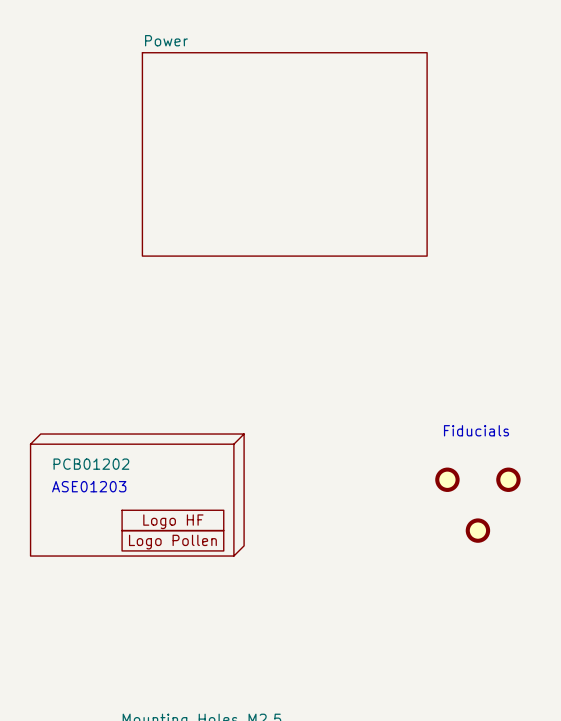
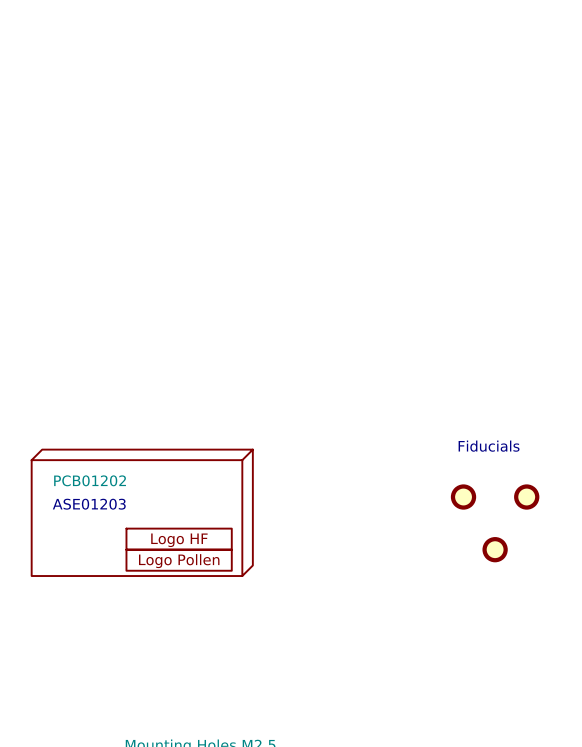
sheet Power: (284, 154) -> none

